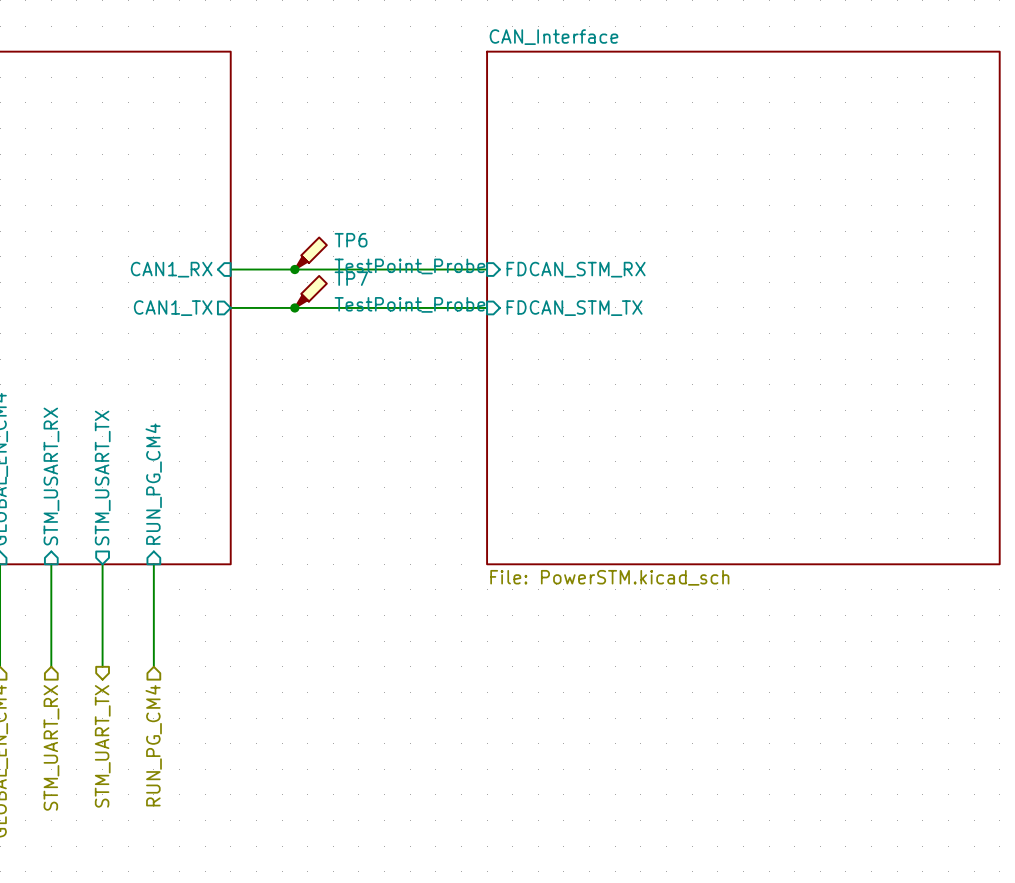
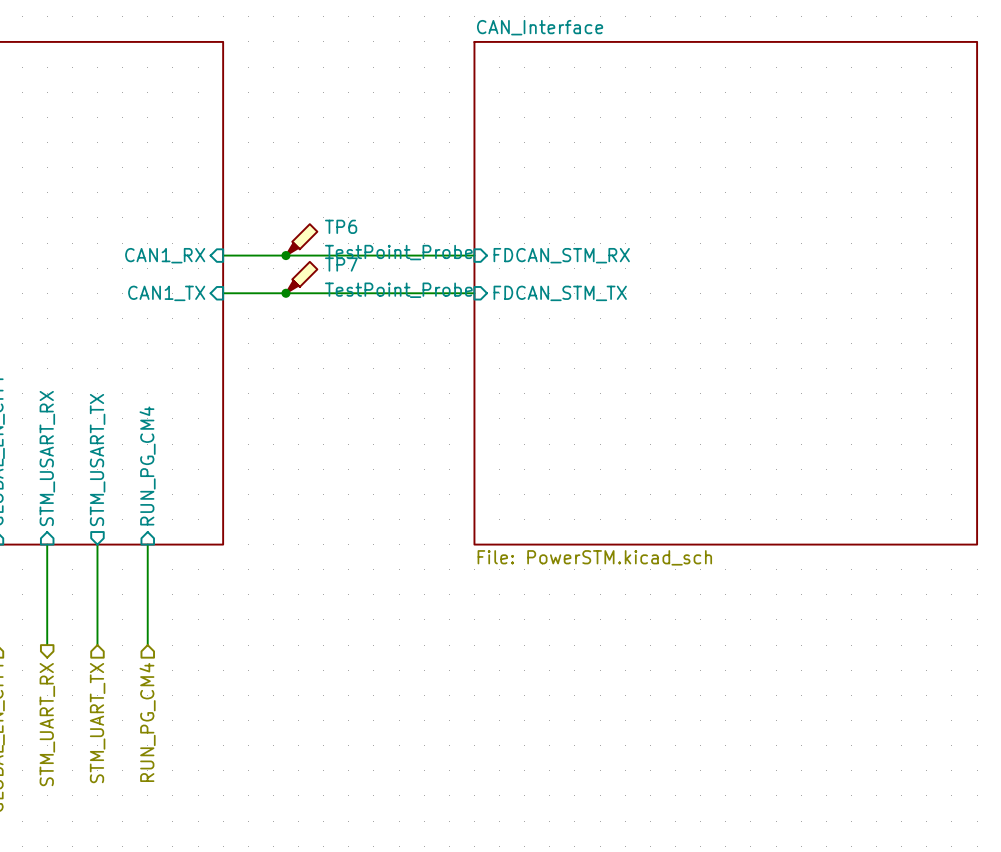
sheet pin shape: output (173, 308) -> input (166, 293)
hierarchical label shape: output (102, 746) -> input (97, 723)
hierarchical label shape: input (51, 747) -> output (47, 724)

